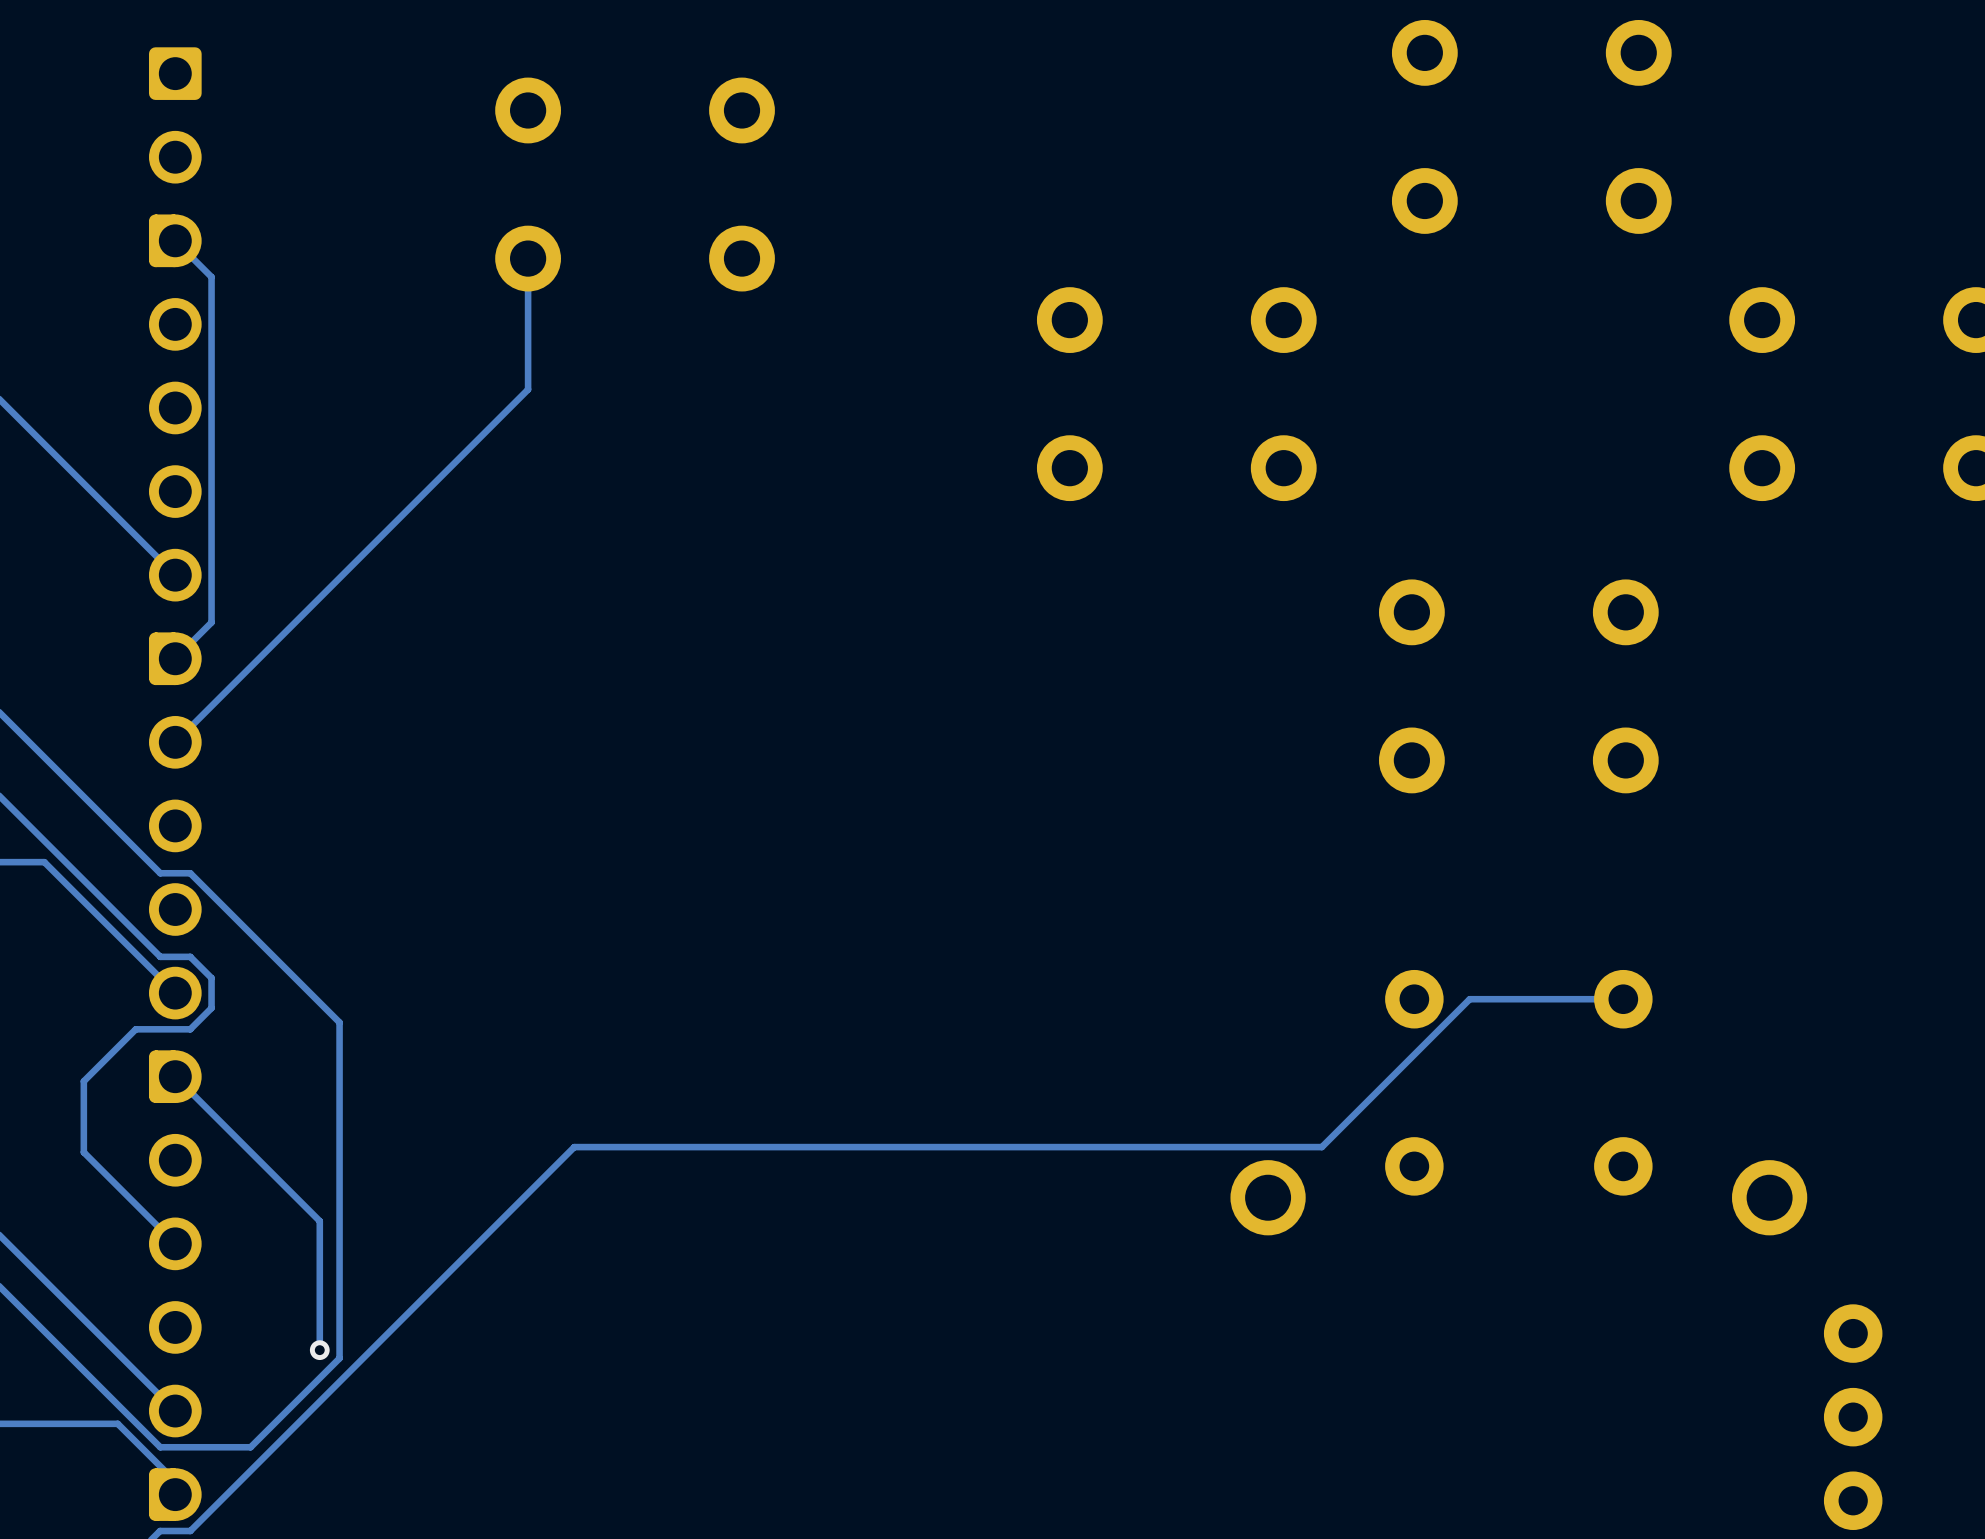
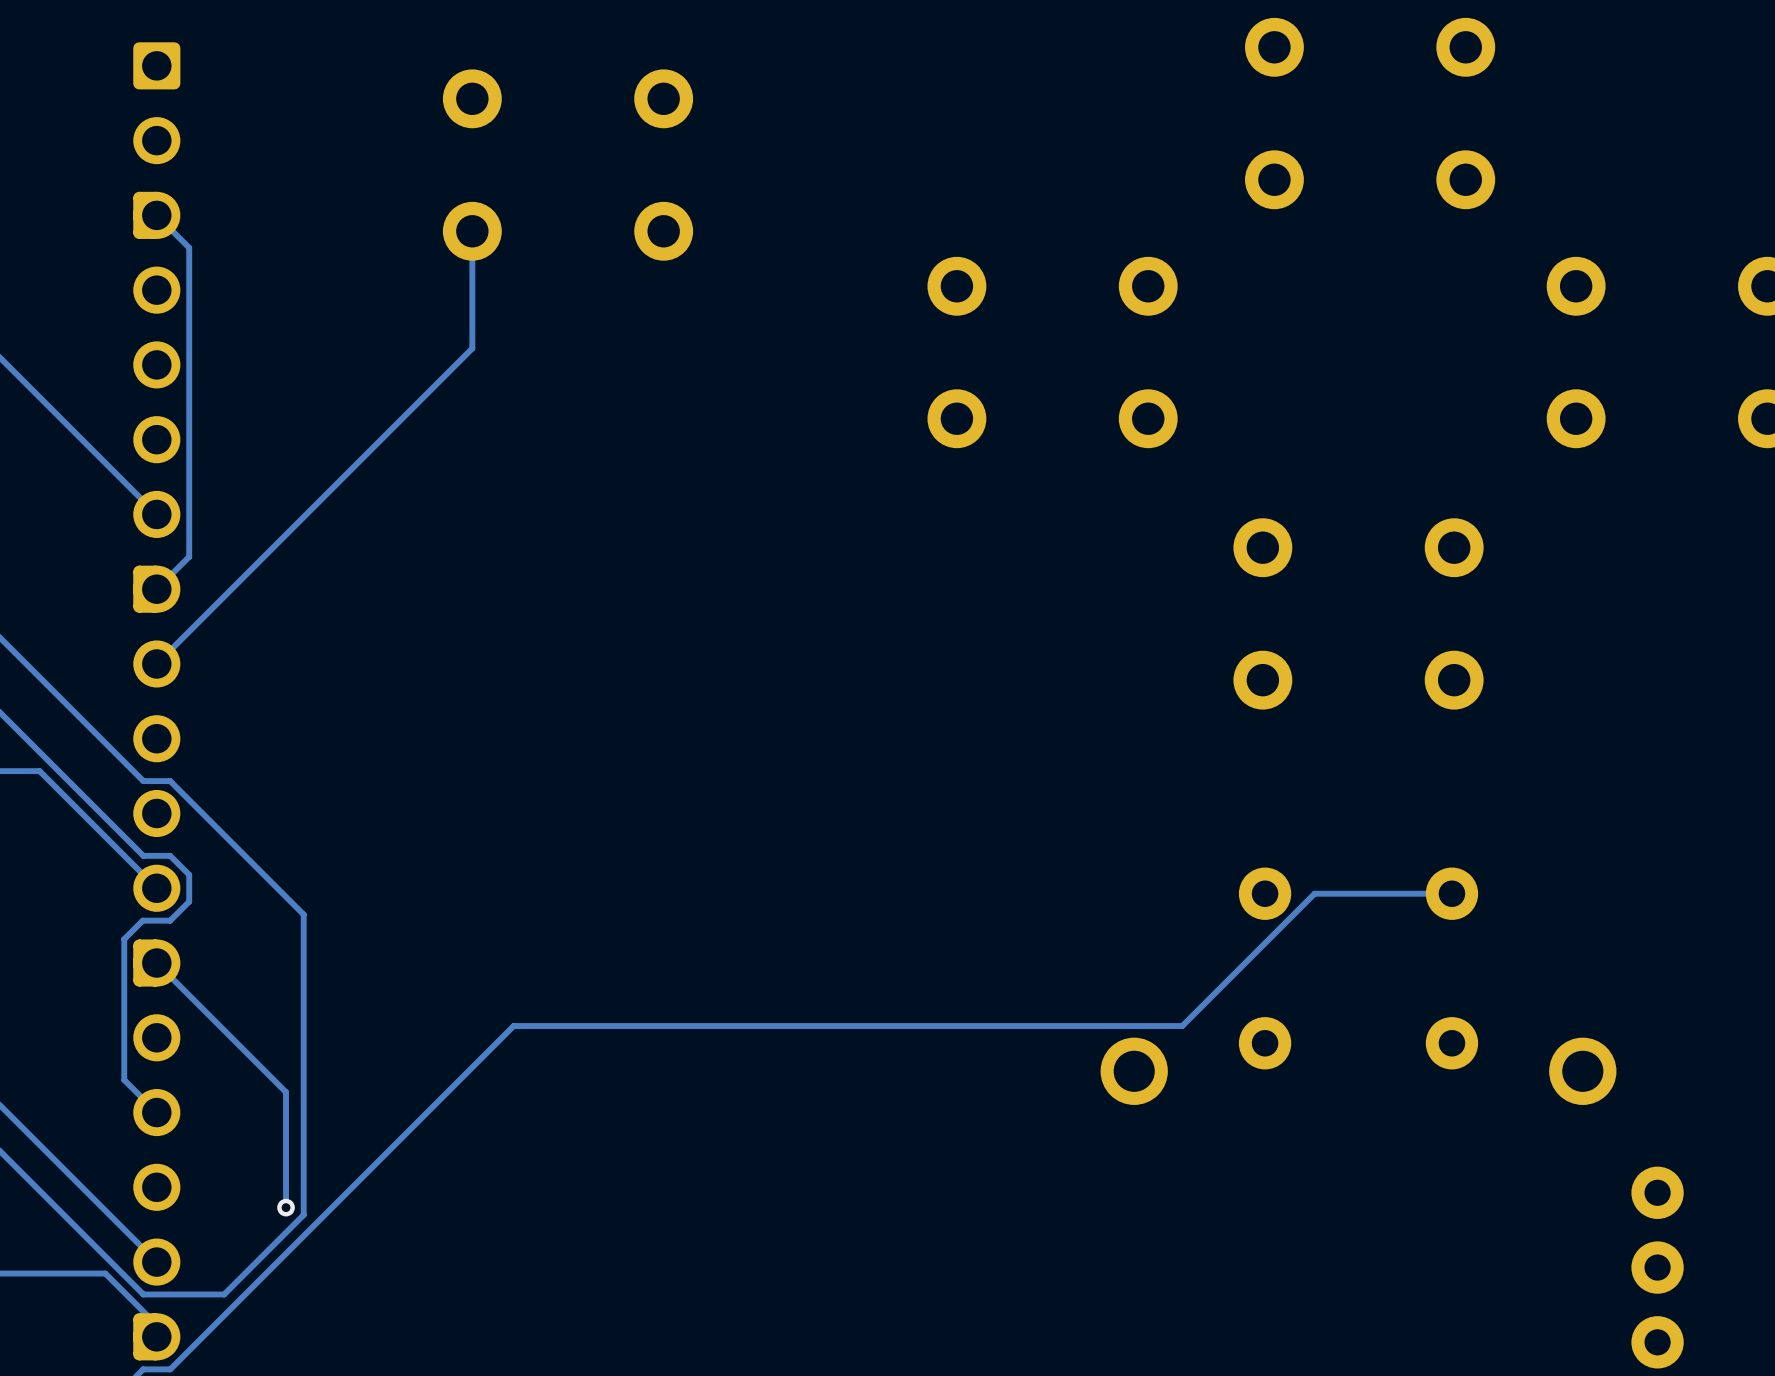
track: (159, 1029) (135, 1029) (83, 1081) (83, 1152) (138, 1207) -> (142, 920) (124, 939) (124, 1079)

